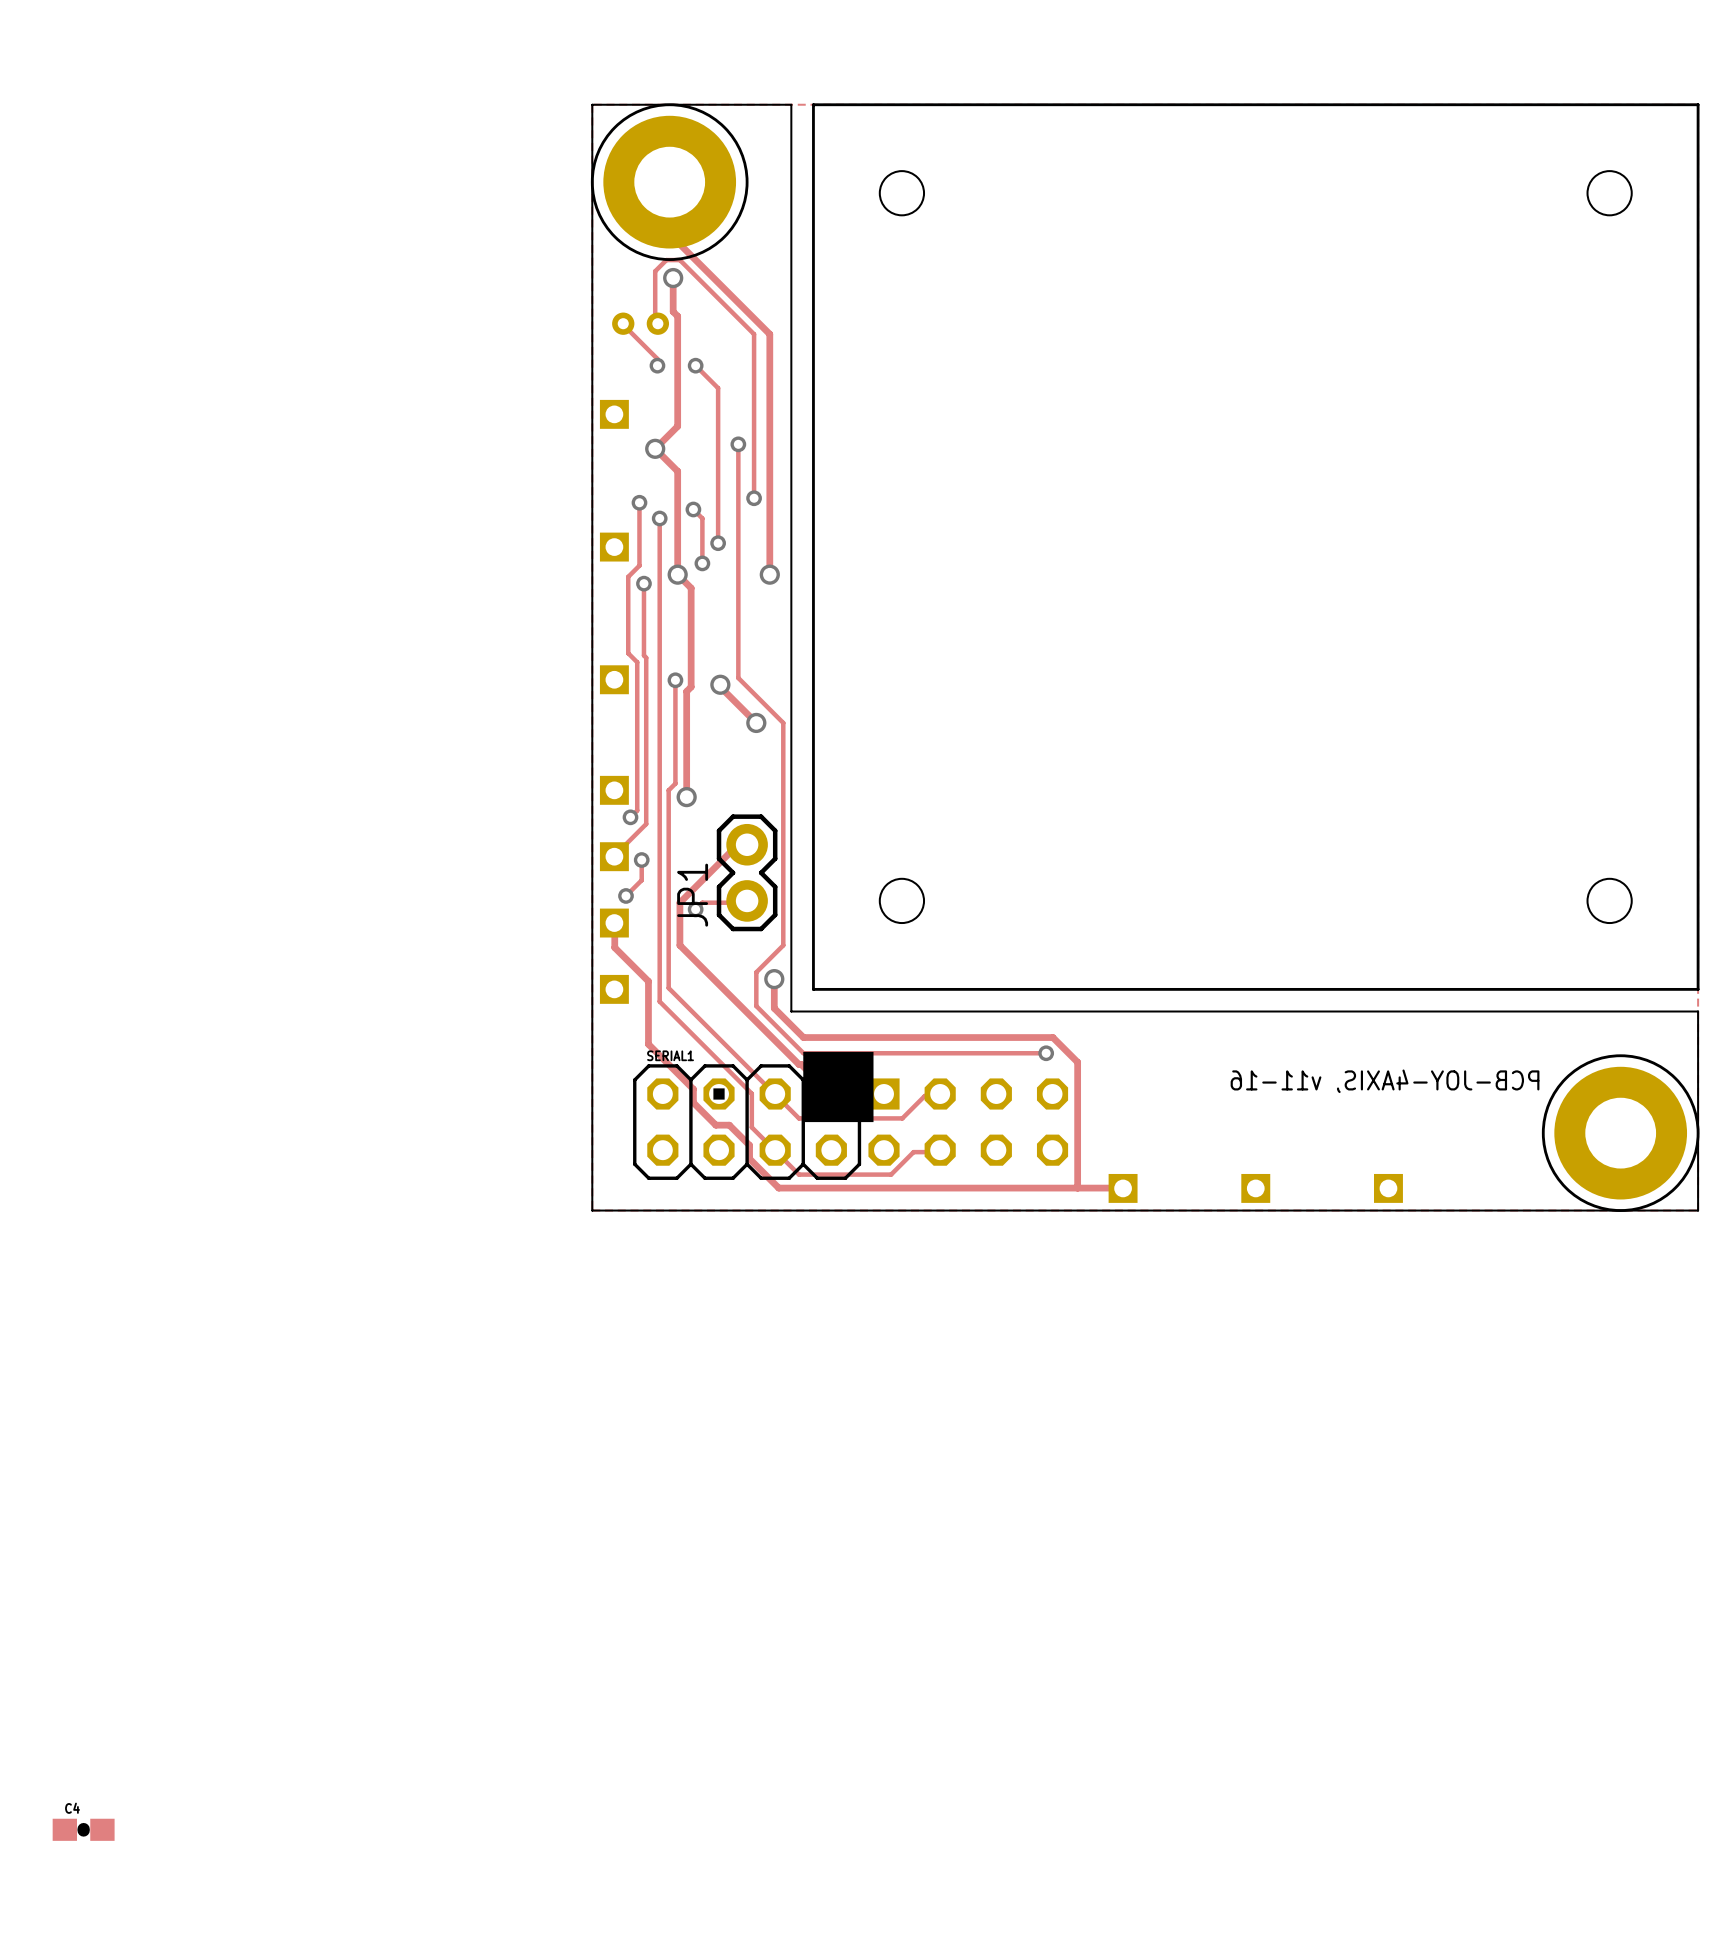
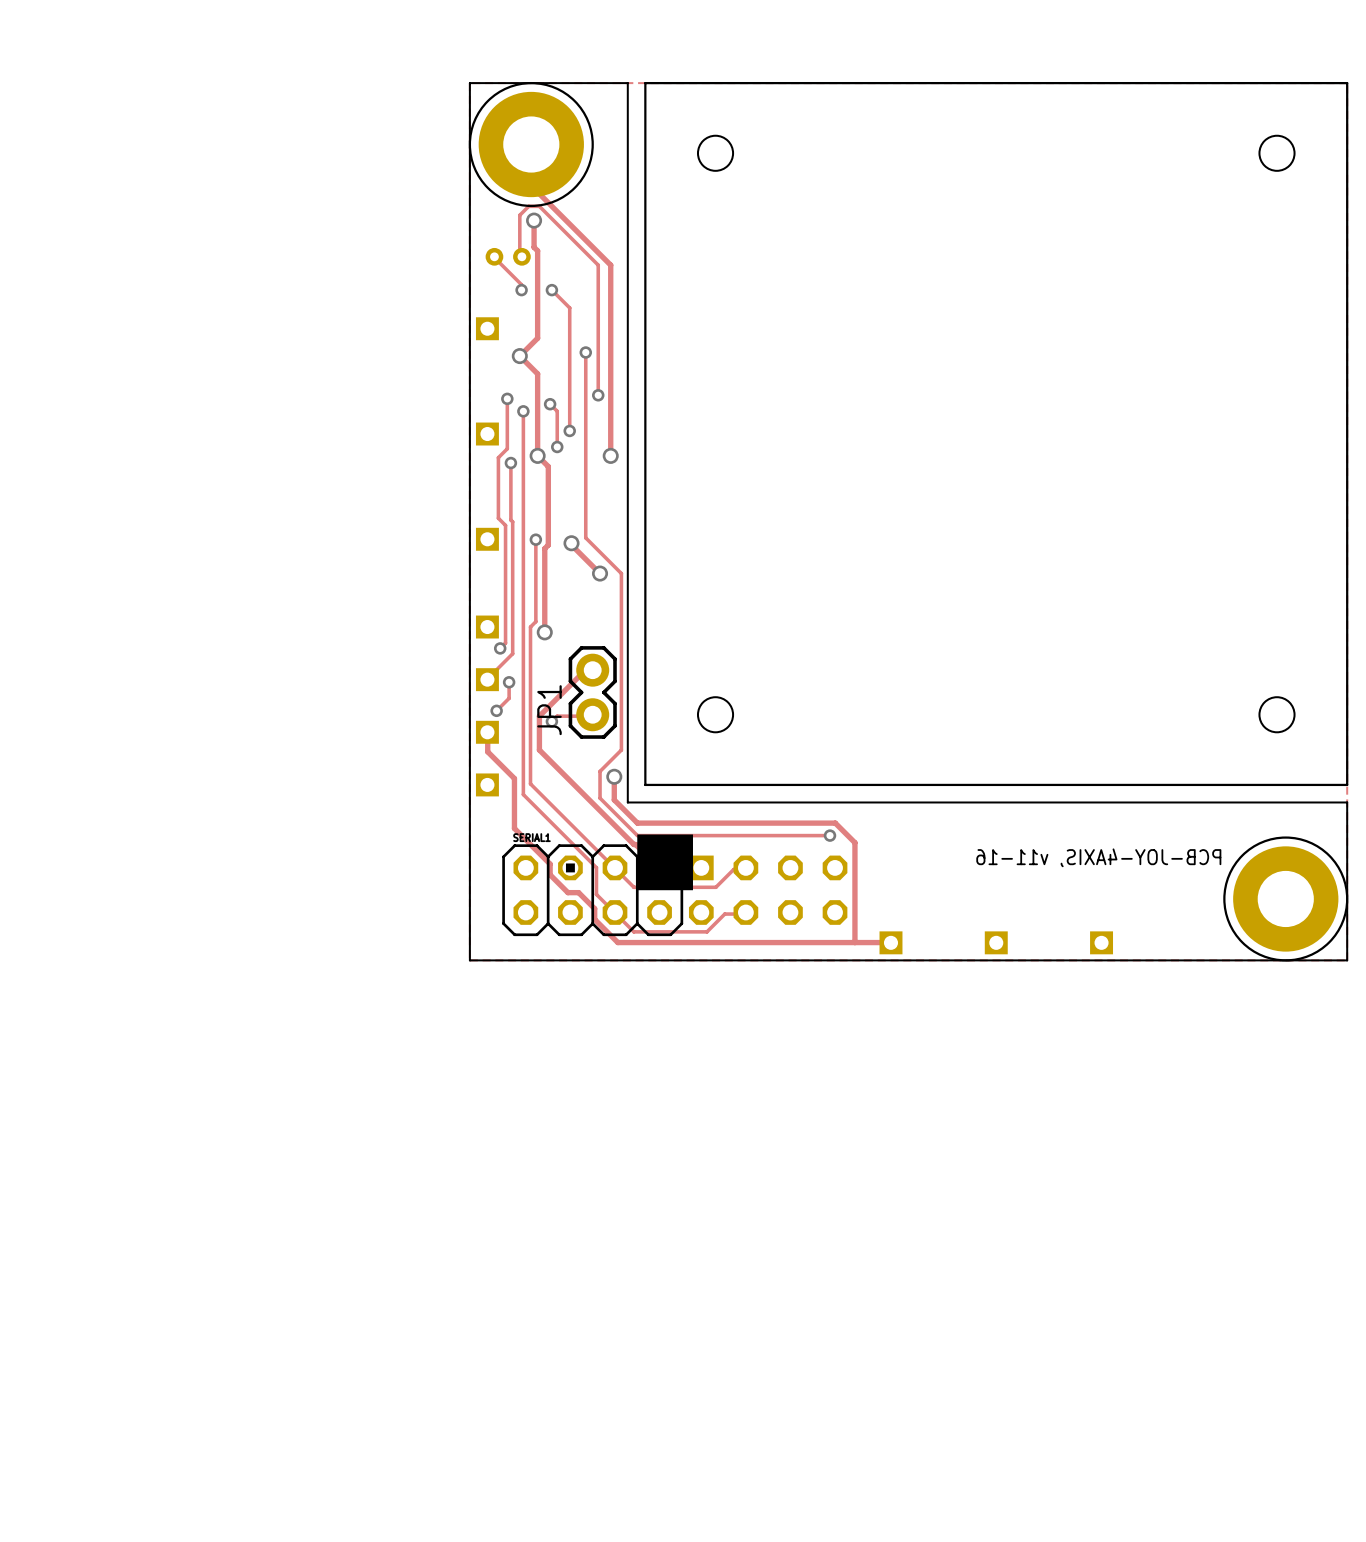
C4: (83, 1829) -> none

